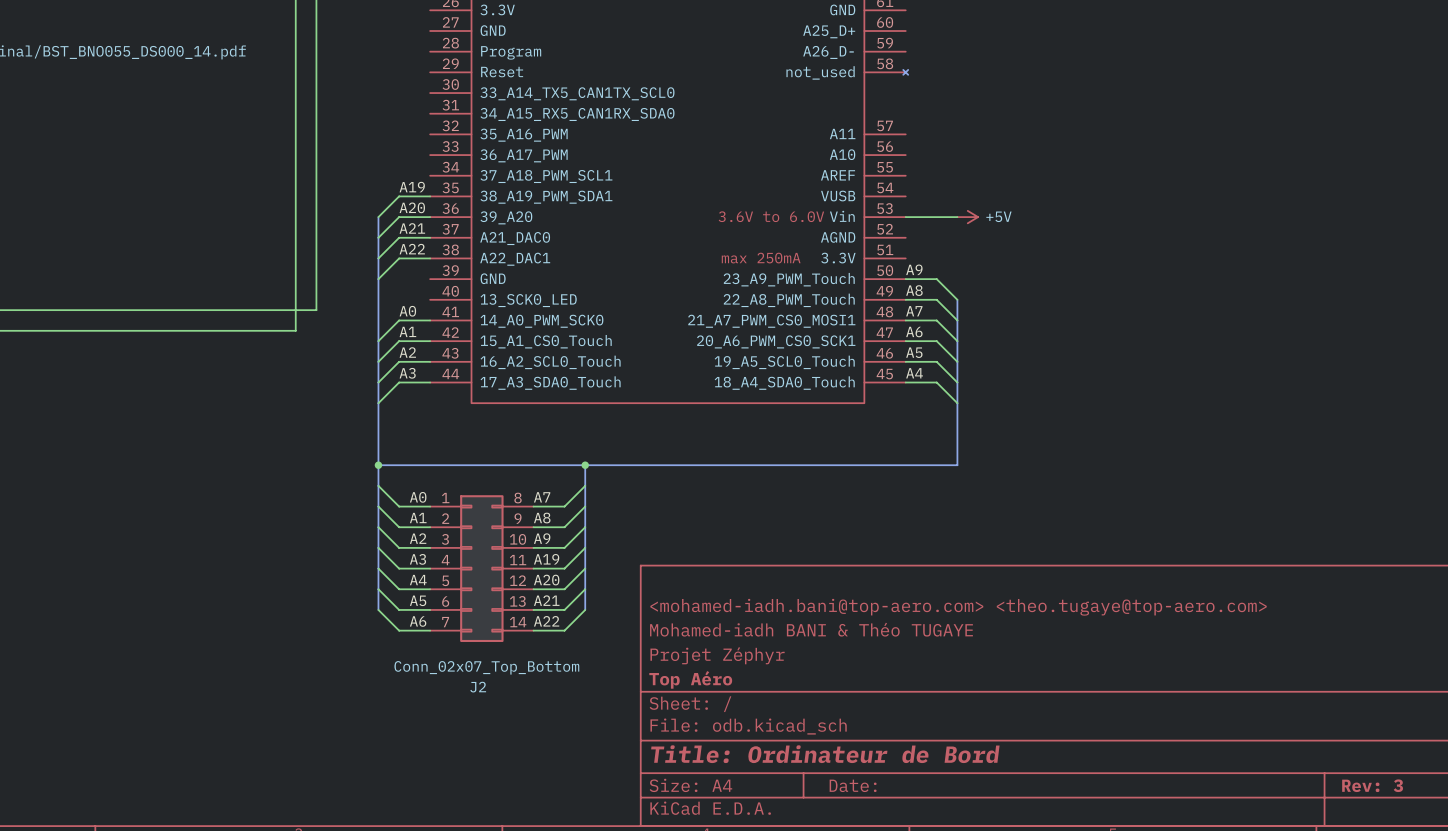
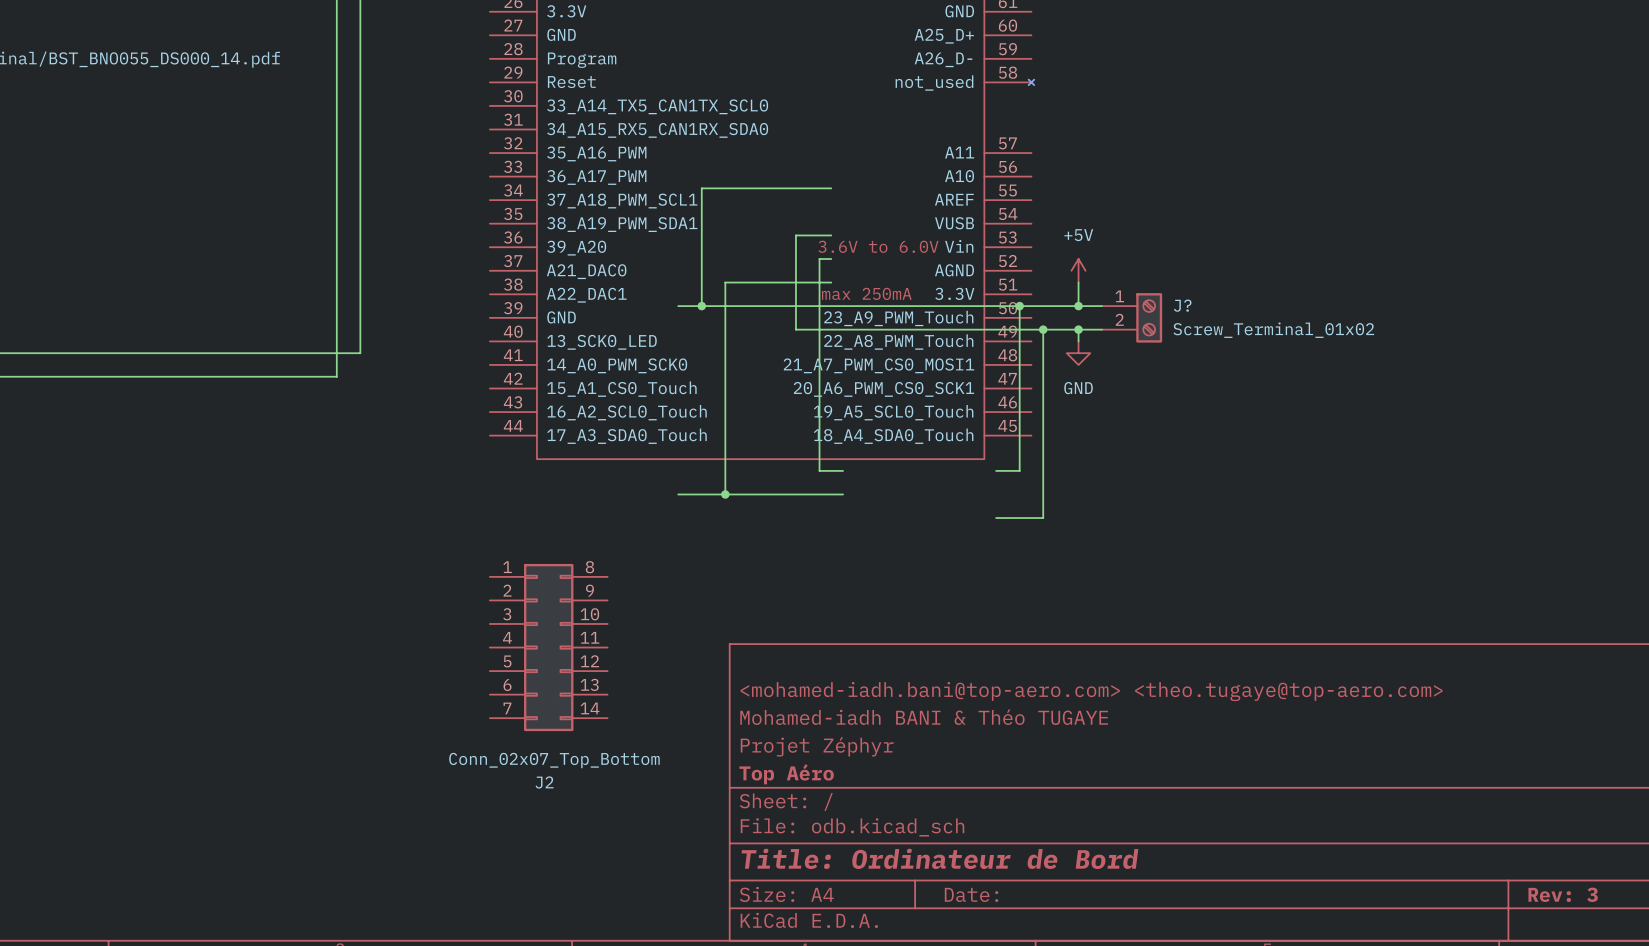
wire: none -> (831, 188) (701, 188) (701, 306)
label: A19 (412, 187) -> none
wire: (430, 196) (399, 196) (378, 217) -> none
wire: none -> (831, 235) (795, 235) (795, 329) (1102, 329)
label: A20 (412, 207) -> none
bus: (378, 217) (378, 609) -> none
wire: (430, 217) (399, 217) (378, 237) -> none
wire: (905, 217) (957, 217) -> none
power symbol rotation: 0° (967, 217) -> 90° counterclockwise (1078, 270)
power symbol position: +5V (967, 217) -> +5V (1078, 270)
wire: none -> (831, 259) (819, 259) (819, 470) (843, 470)
label: A21 (412, 228) -> none
wire: (430, 237) (399, 237) (378, 258) -> none
wire: none -> (831, 282) (725, 282) (725, 494)
wire: none -> (1078, 282) (1078, 306)
label: A22 (412, 249) -> none
wire: (430, 258) (399, 258) (378, 279) -> none
wire: none -> (678, 306) (1102, 306)
junction: none -> (701, 306)
wire: none -> (1019, 306) (1019, 470) (996, 470)
junction: none -> (1019, 306)
junction: none -> (1078, 306)
label: A9 (914, 269) -> none
wire: (905, 279) (936, 279) (957, 299) -> none
J?: none -> Screw_Terminal_01x02 (1132, 317)
wire: none -> (1043, 329) (1043, 518) (996, 518)
junction: none -> (1043, 329)
wire: none -> (1078, 329) (1078, 341)
junction: none -> (1078, 329)
label: A8 (914, 290) -> none
wire: (905, 299) (936, 299) (957, 320) -> none
bus: (957, 299) (957, 465) (378, 465) -> none
power symbol: none -> GND (1078, 353)
label: A0 (407, 311) -> none
label: A7 (914, 311) -> none
wire: (430, 320) (399, 320) (378, 341) -> none
wire: (905, 320) (936, 320) (957, 341) -> none
label: A1 (407, 331) -> none
label: A6 (914, 332) -> none
wire: (430, 341) (399, 341) (378, 361) -> none
wire: (905, 341) (936, 341) (957, 361) -> none
label: A2 (407, 352) -> none
label: A5 (914, 352) -> none
wire: (430, 361) (399, 361) (378, 382) -> none
wire: (905, 361) (936, 361) (957, 382) -> none
label: A3 (407, 373) -> none
label: A4 (914, 373) -> none
wire: (430, 382) (399, 382) (378, 403) -> none
wire: (905, 382) (936, 382) (957, 403) -> none
wire: none -> (678, 494) (843, 494)
junction: none -> (725, 494)
junction: (378, 465) -> none
bus: (585, 465) (585, 609) -> none
junction: (585, 465) -> none
wire: (378, 485) (399, 506) (430, 506) -> none
wire: (585, 485) (564, 506) (533, 506) -> none
label: A0 (418, 497) -> none
label: A7 (542, 497) -> none
wire: (378, 506) (399, 527) (430, 527) -> none
wire: (585, 506) (564, 527) (533, 527) -> none
label: A1 (418, 518) -> none
label: A8 (542, 518) -> none
wire: (378, 527) (399, 547) (430, 547) -> none
wire: (585, 527) (564, 547) (533, 547) -> none
label: A2 (418, 538) -> none
label: A9 (542, 538) -> none
wire: (378, 547) (399, 568) (430, 568) -> none
wire: (585, 547) (564, 568) (533, 568) -> none
label: A3 (417, 559) -> none
label: A19 (546, 559) -> none
wire: (378, 568) (399, 589) (430, 589) -> none
wire: (585, 568) (564, 589) (533, 589) -> none
label: A4 (418, 580) -> none
label: A20 (546, 580) -> none
wire: (378, 589) (399, 609) (430, 609) -> none
wire: (585, 589) (564, 609) (533, 609) -> none
label: A5 (418, 600) -> none
label: A21 (546, 600) -> none
wire: (378, 609) (399, 630) (430, 630) -> none
wire: (585, 609) (564, 630) (533, 630) -> none
label: A6 (418, 621) -> none
label: A22 (546, 621) -> none

